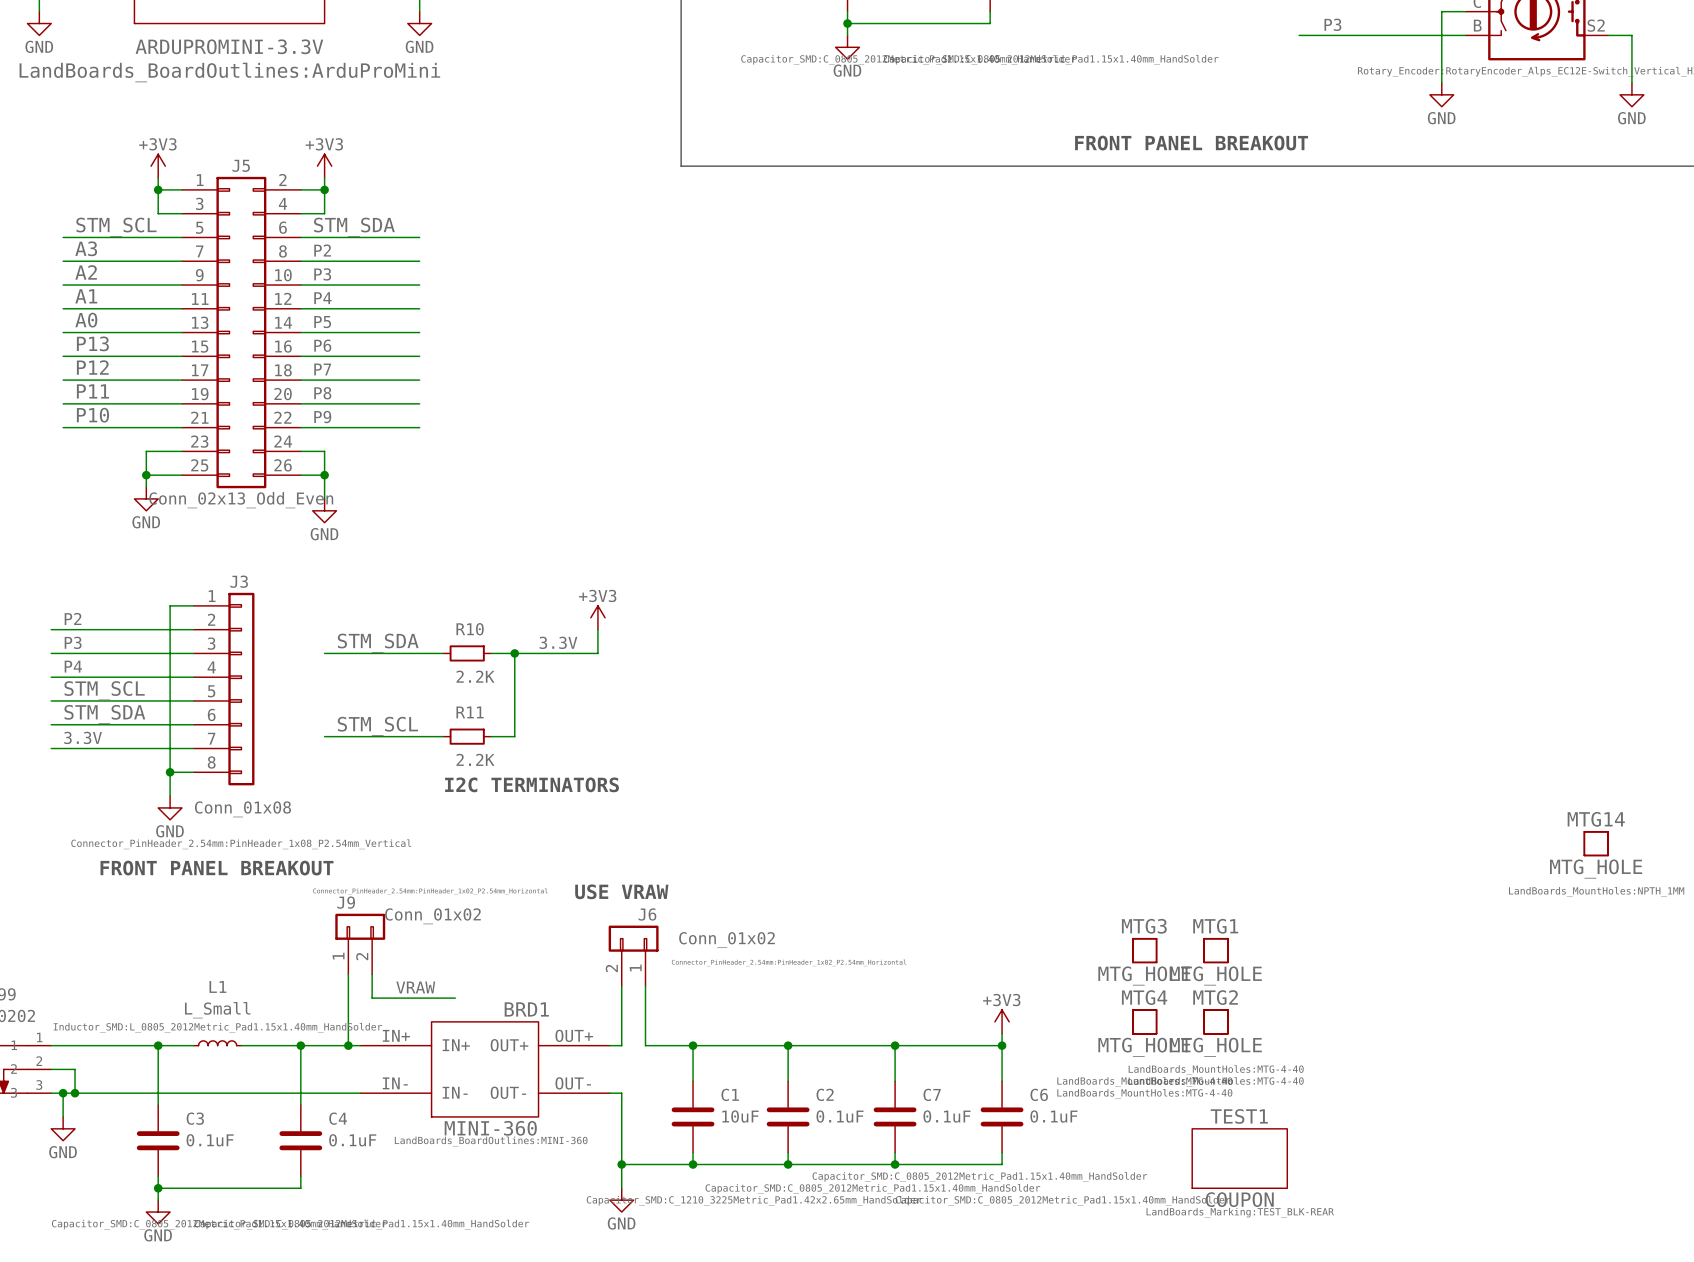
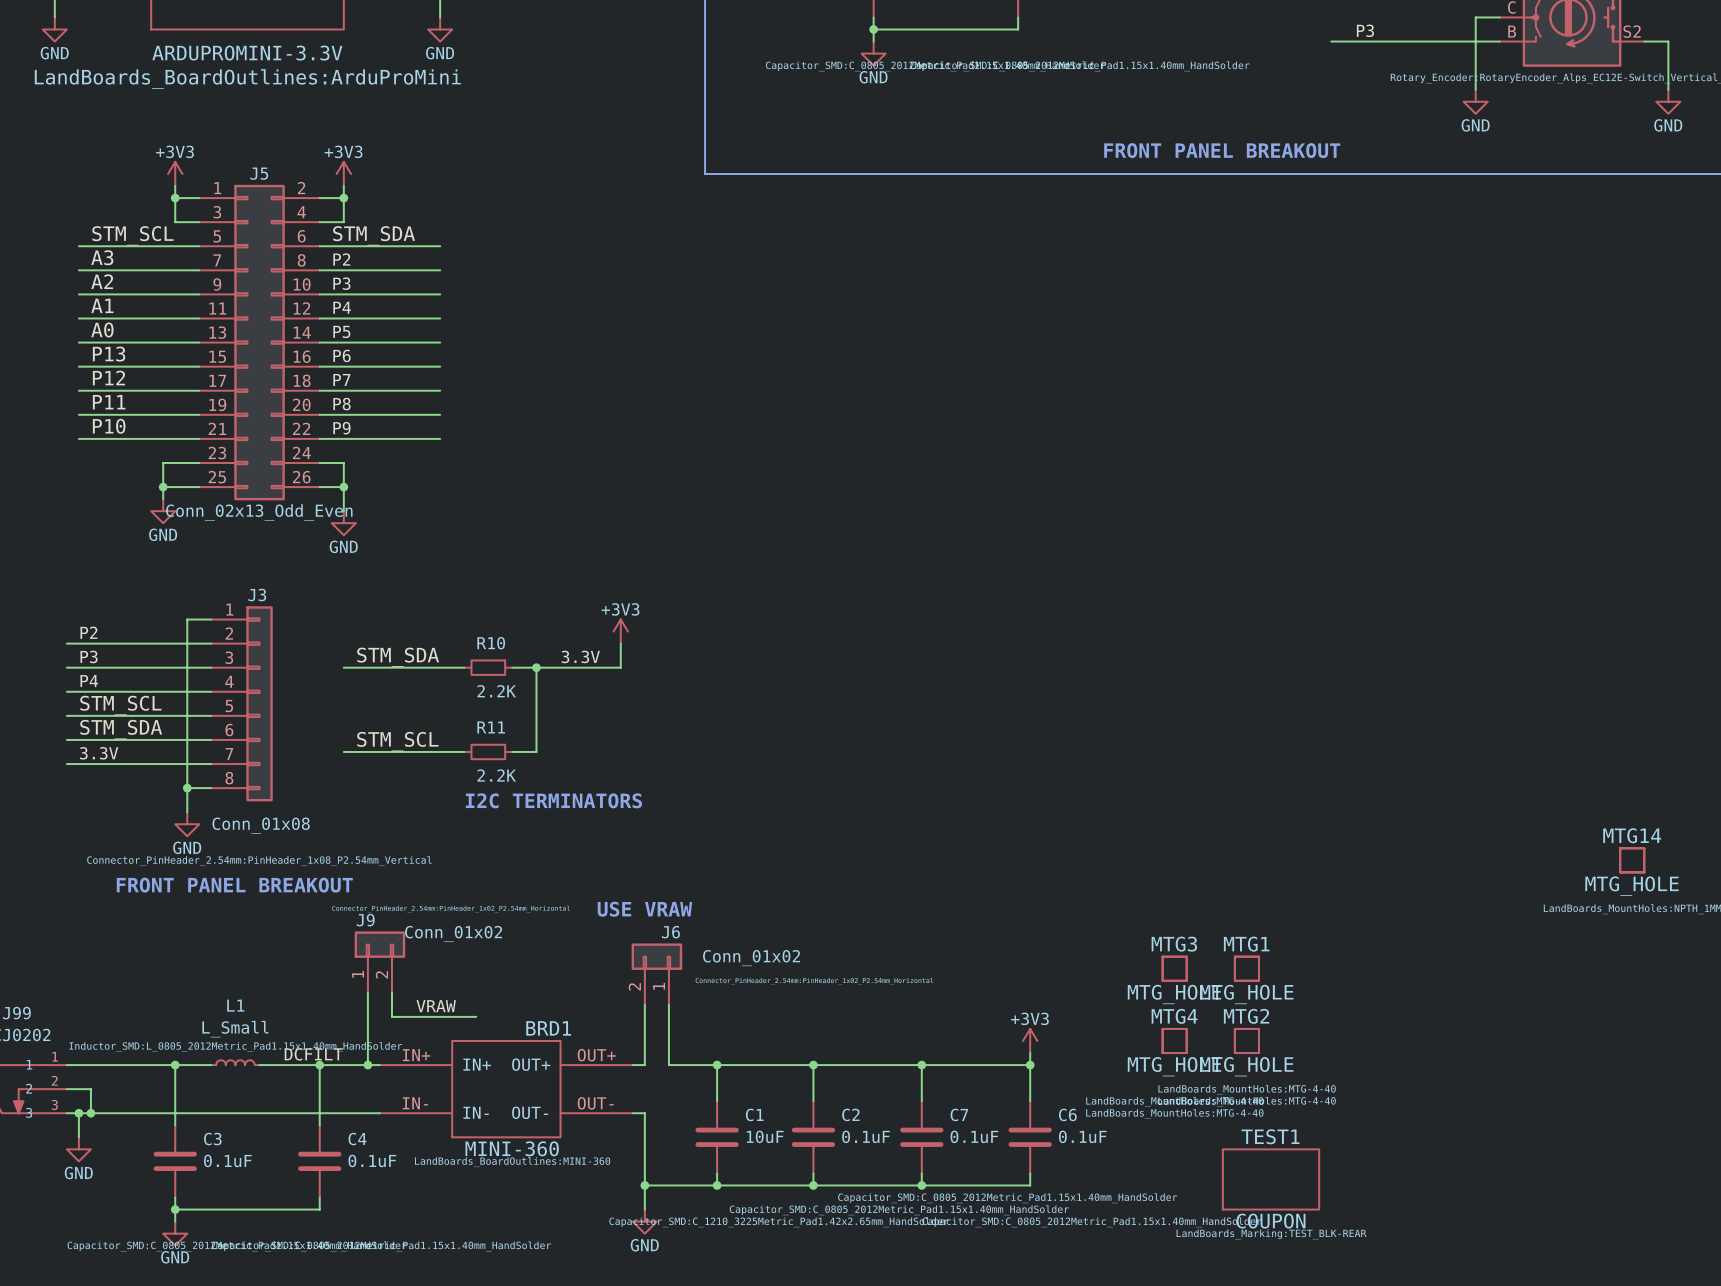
label: none -> DCFILT (313, 1054)

